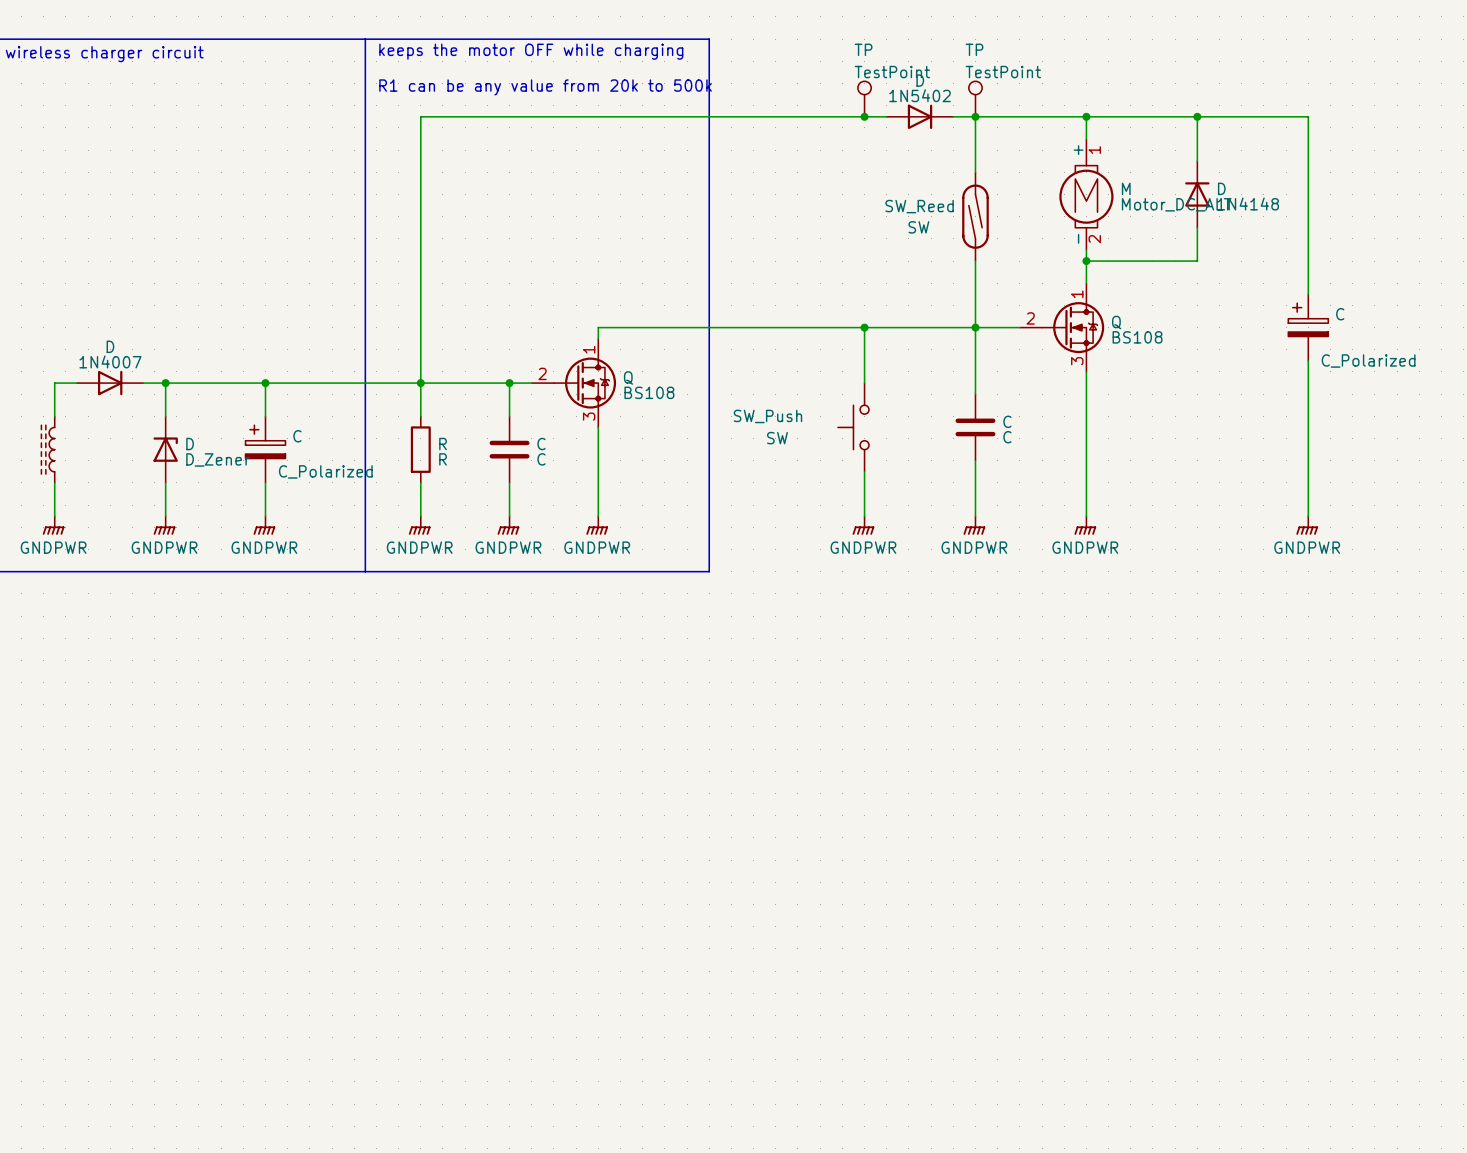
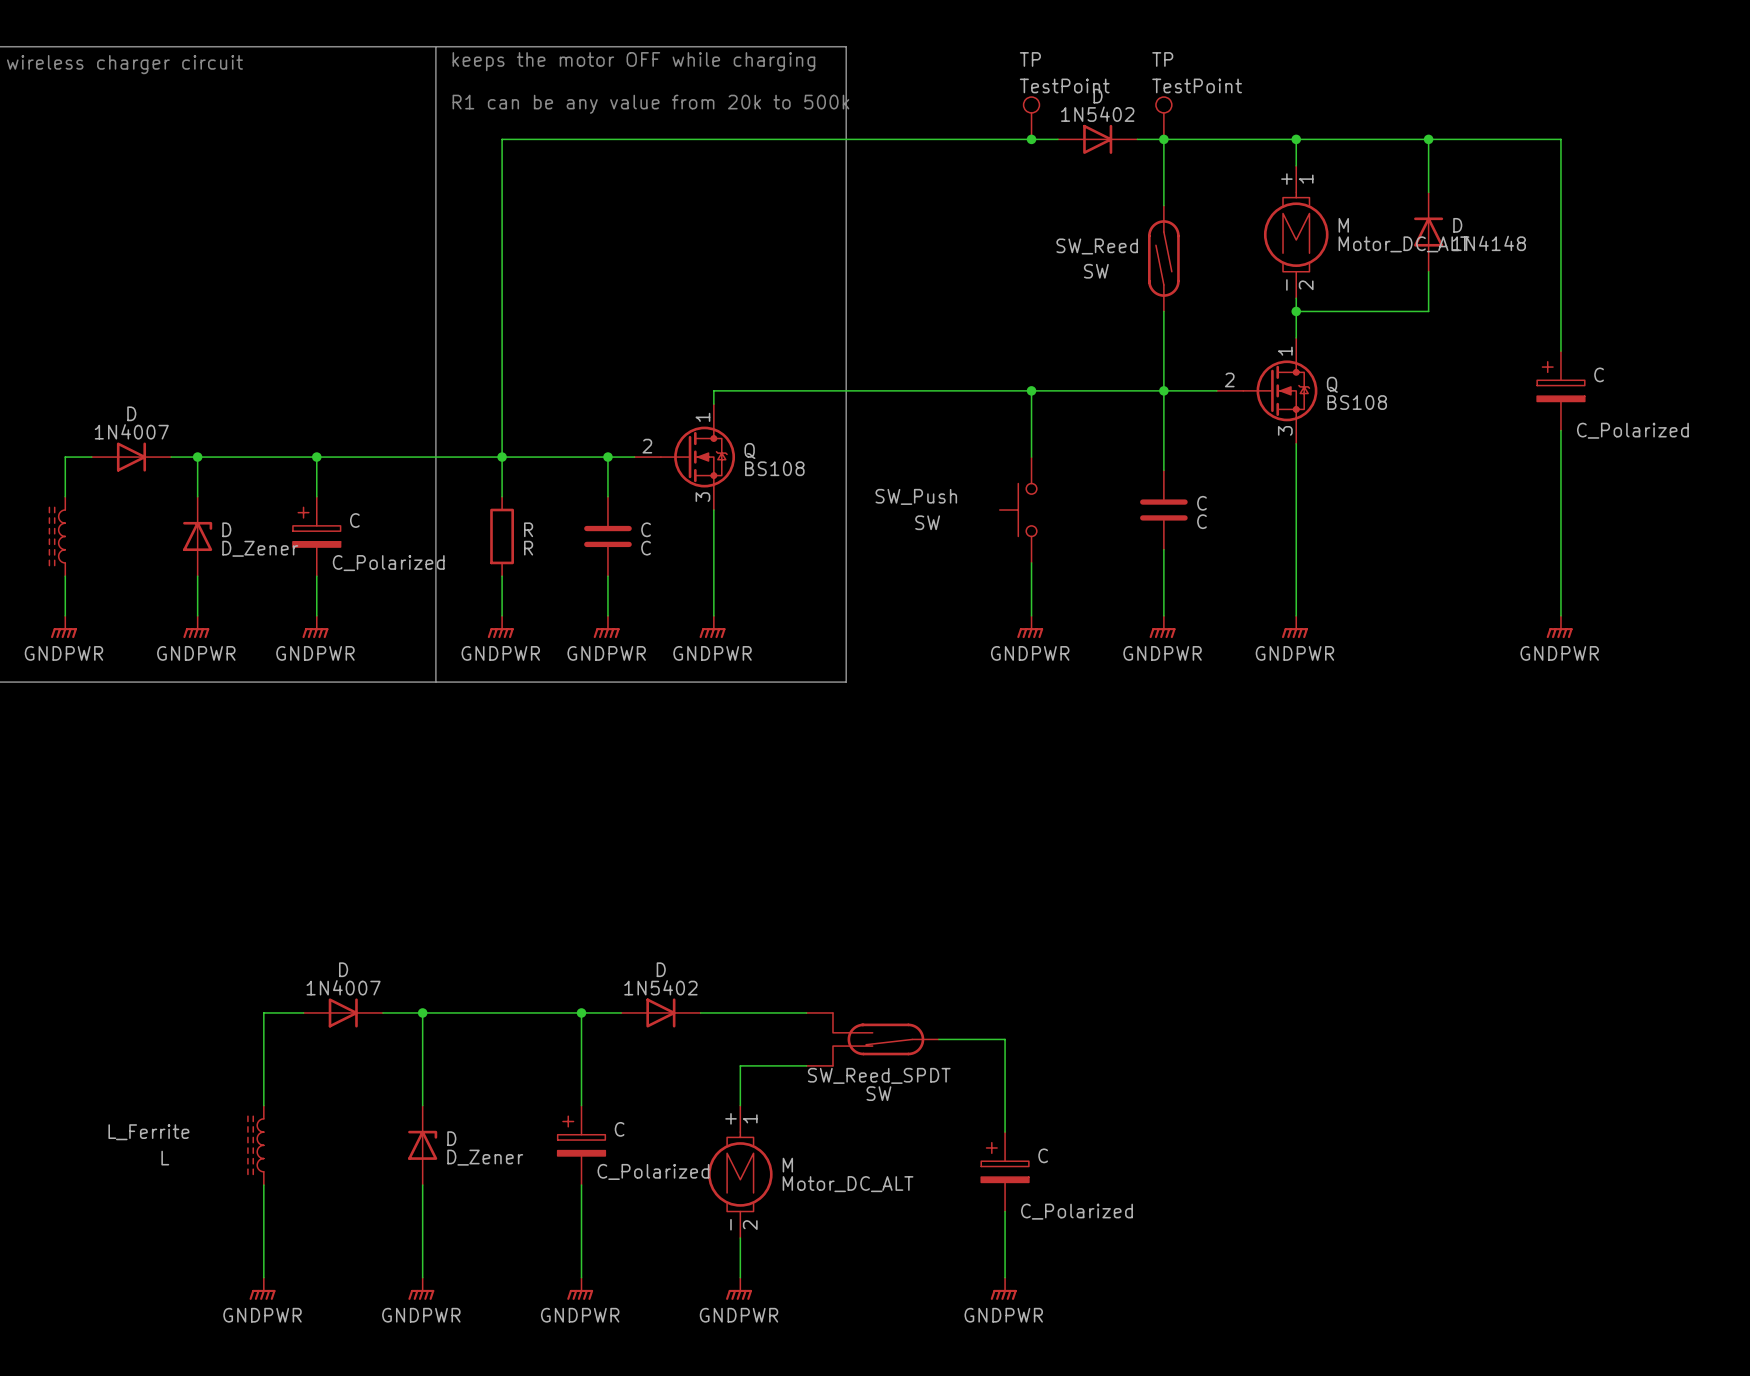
wire: none -> (303, 1012) (263, 1012) (263, 1105)
D: none -> 1N4007 (343, 1012)
wire: none -> (382, 1012) (621, 1012)
wire: none -> (422, 1012) (422, 1105)
junction: none -> (422, 1012)
wire: none -> (581, 1012) (581, 1105)
junction: none -> (581, 1012)
D: none -> 1N5402 (660, 1012)
wire: none -> (700, 1012) (806, 1012)
SW: none -> SW_Reed_SPDT (872, 1039)
wire: none -> (938, 1039) (1005, 1039) (1005, 1132)
wire: none -> (806, 1065) (740, 1065) (740, 1105)
L: none -> L_Ferrite (255, 1145)
D: none -> D_Zener (422, 1145)
C: none -> C_Polarized (581, 1145)
M: none -> Motor_DC_ALT (740, 1171)
C: none -> C_Polarized (1005, 1171)
wire: none -> (263, 1185) (263, 1277)
wire: none -> (422, 1185) (422, 1277)
wire: none -> (581, 1185) (581, 1277)
wire: none -> (1005, 1211) (1005, 1277)
wire: none -> (740, 1237) (740, 1277)
power symbol: none -> GNDPWR (262, 1288)
power symbol: none -> GNDPWR (421, 1288)
power symbol: none -> GNDPWR (580, 1288)
power symbol: none -> GNDPWR (739, 1288)
power symbol: none -> GNDPWR (1003, 1288)

